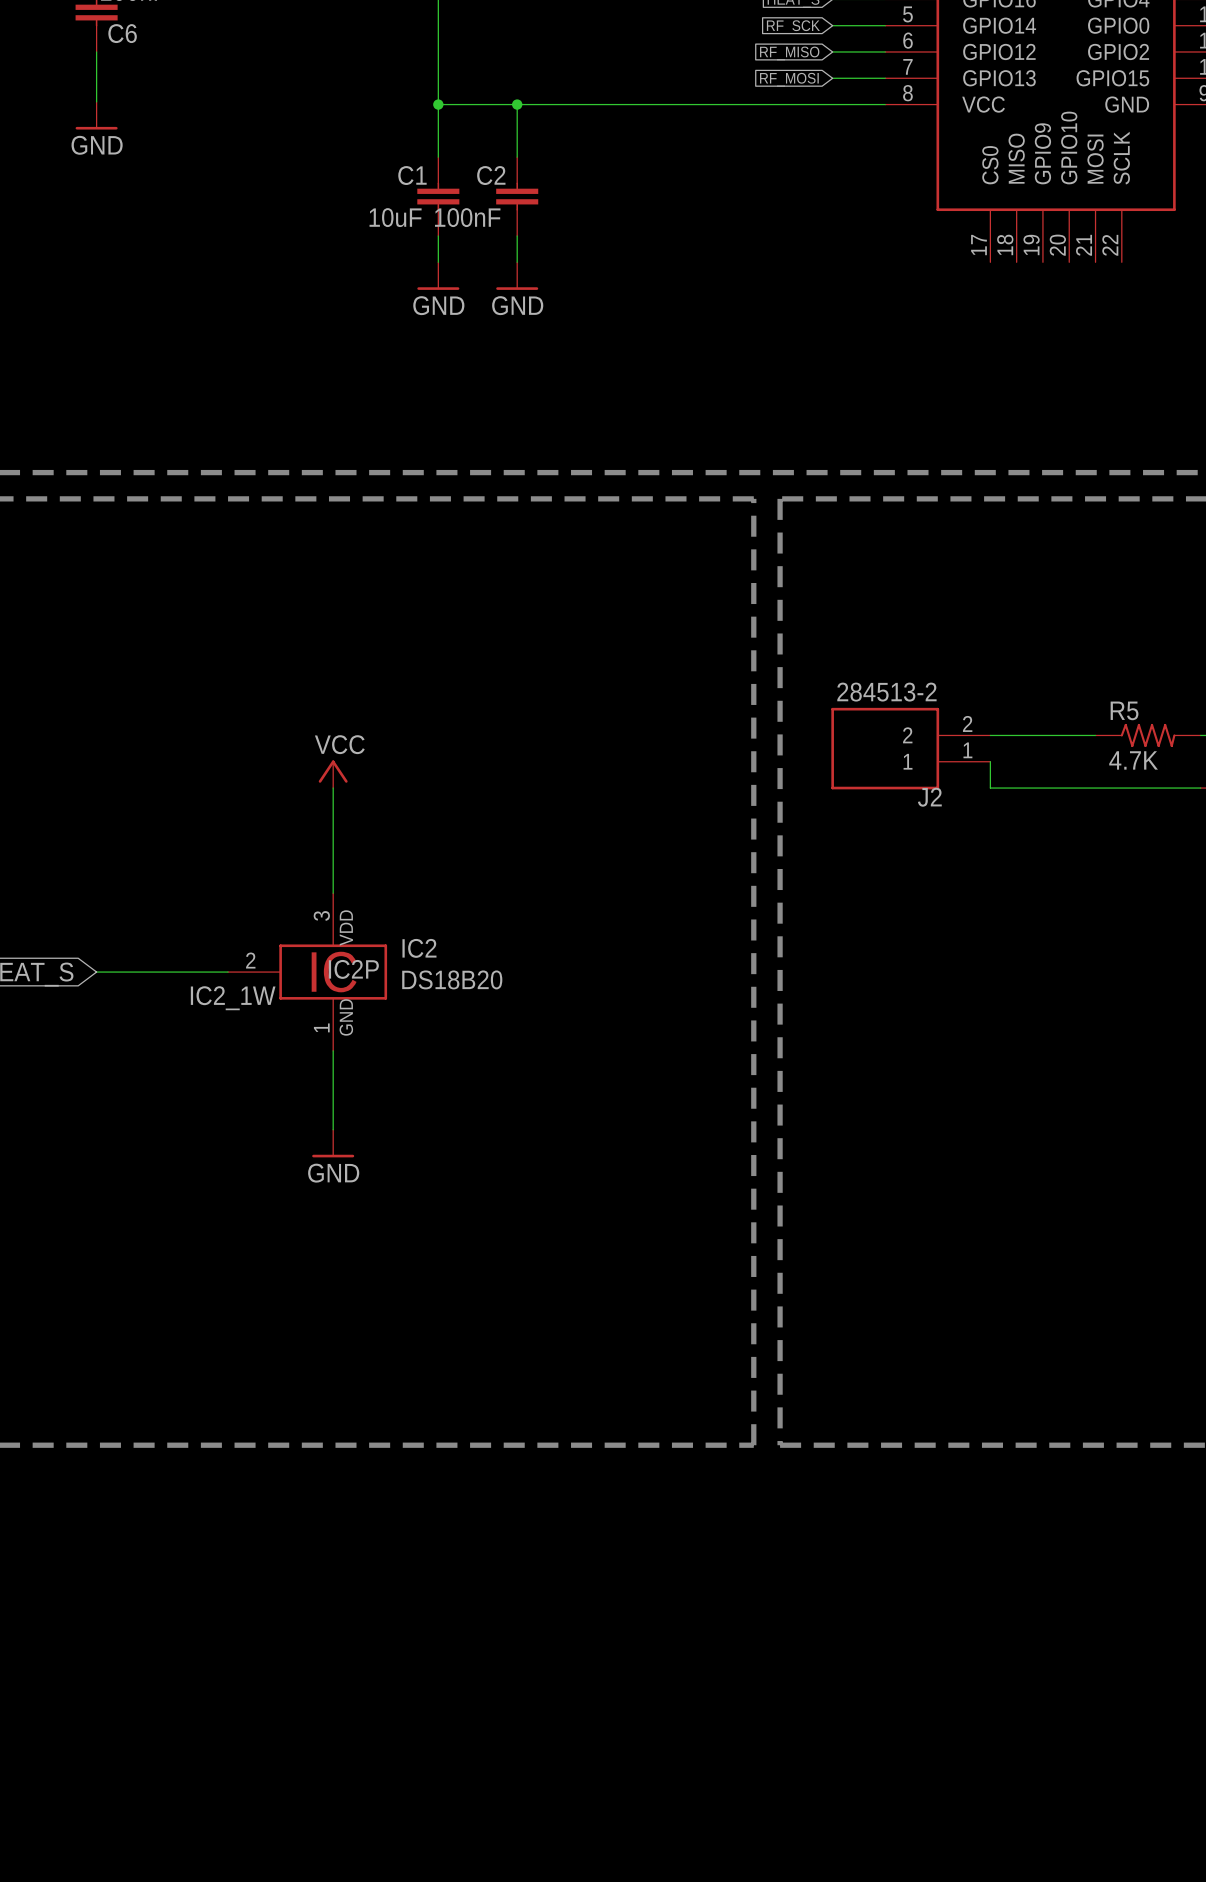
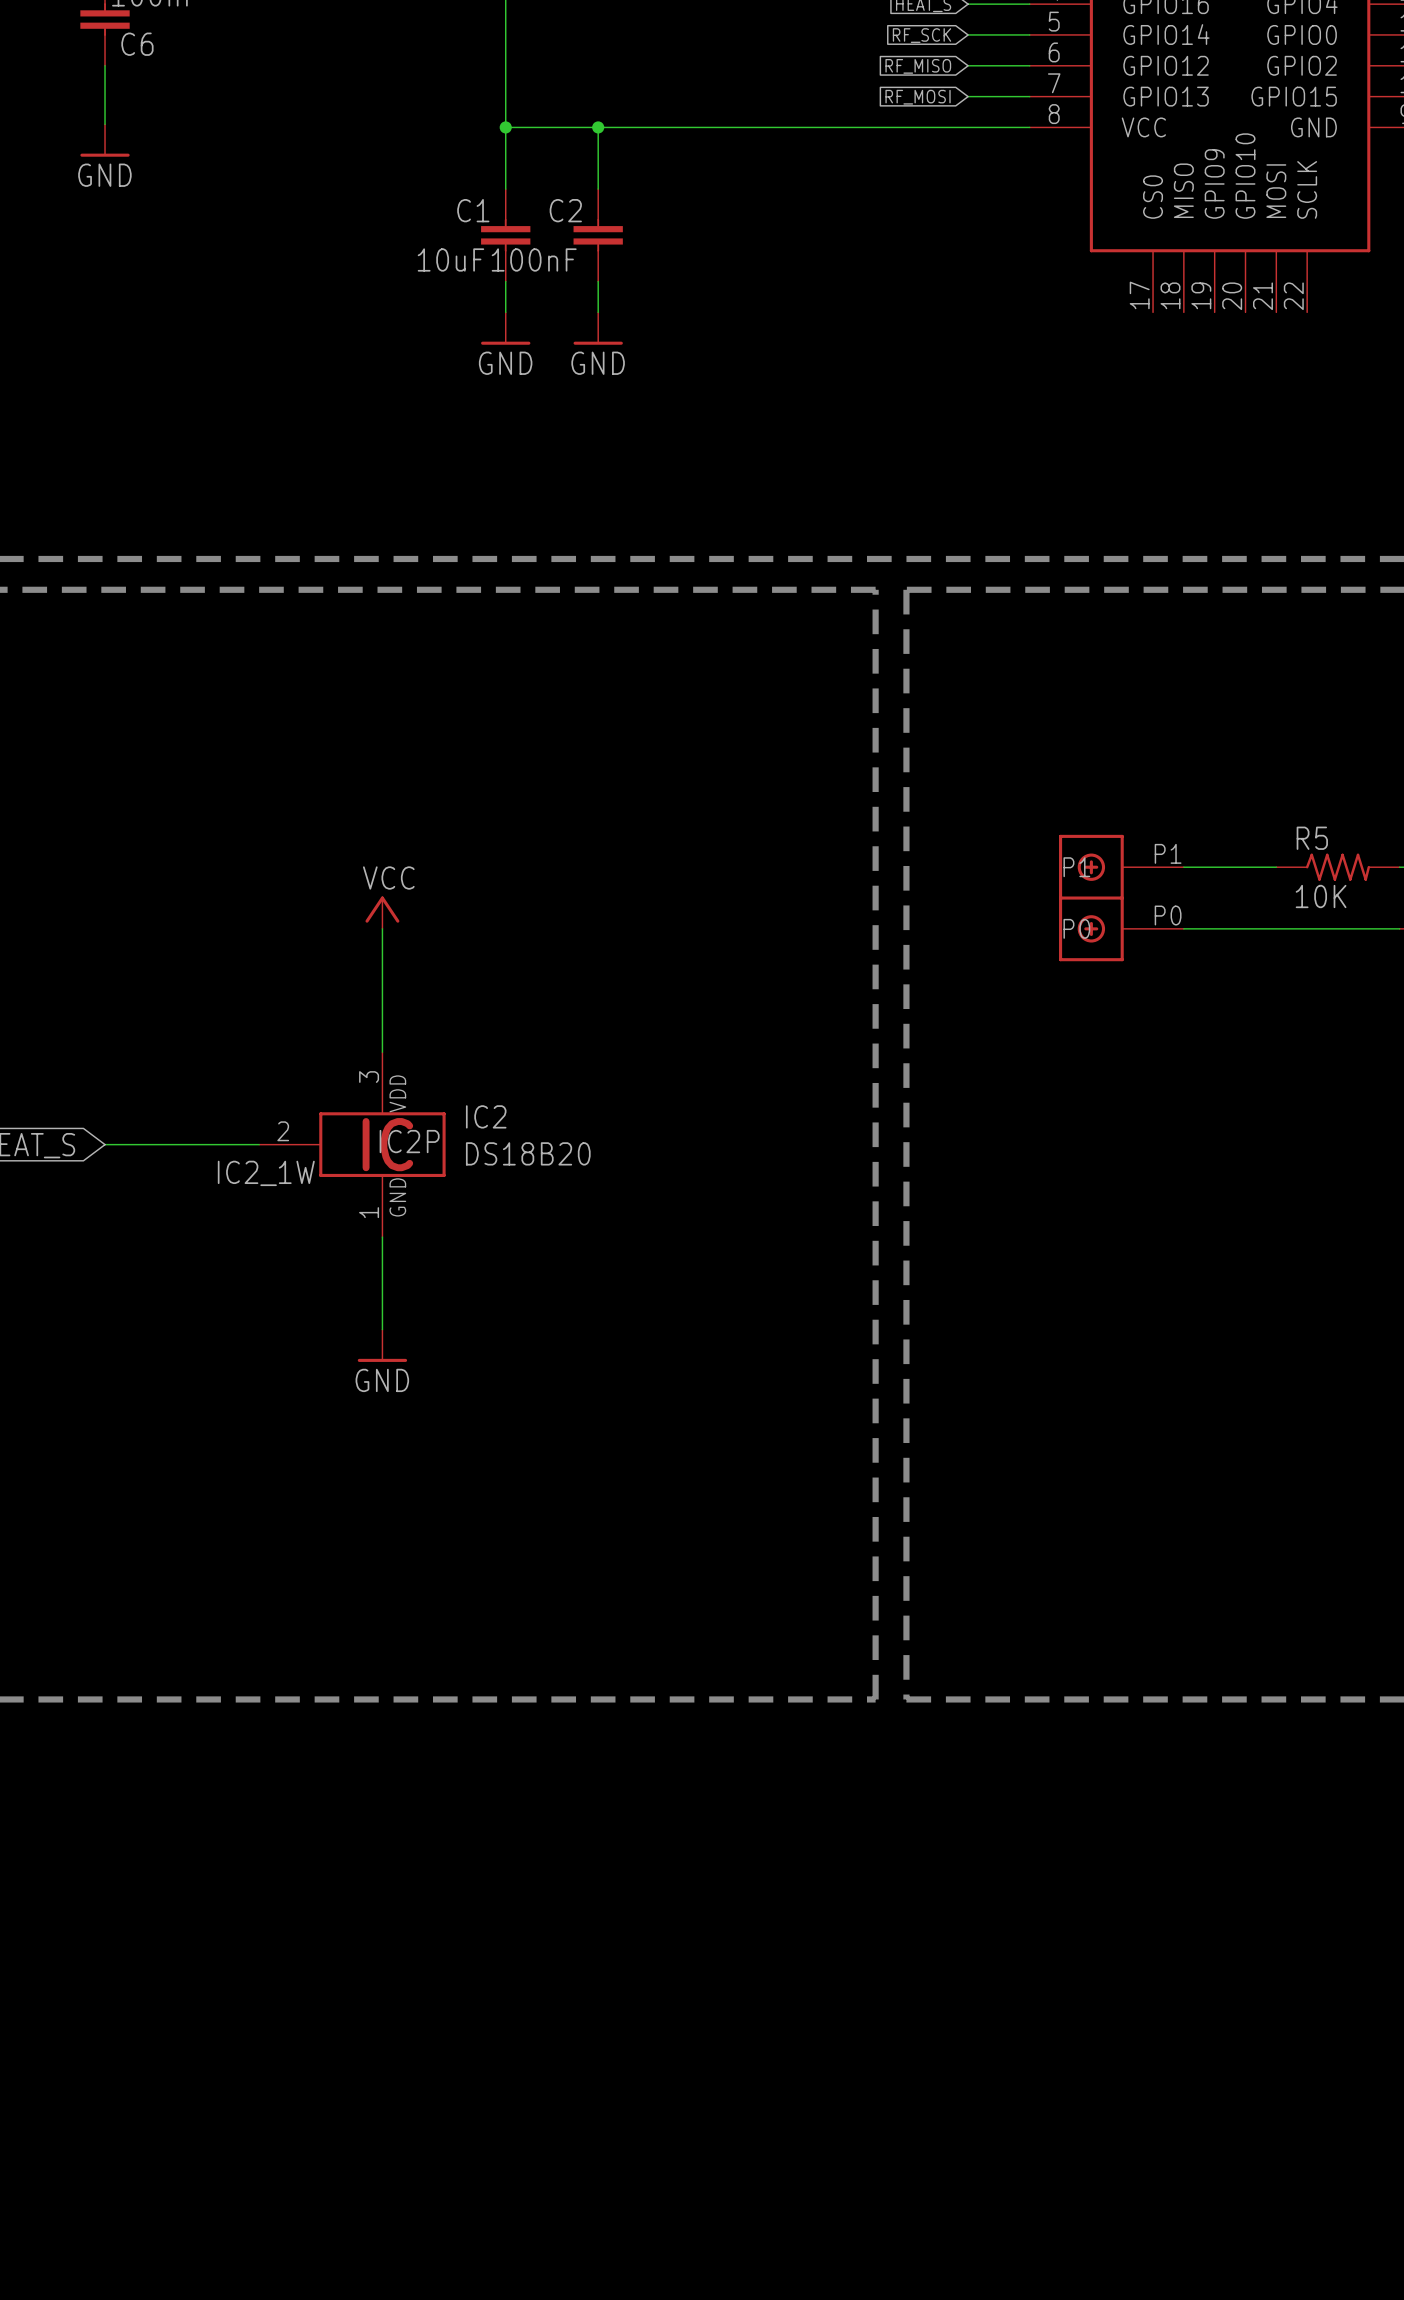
J2: 284513-2 (910, 748) -> none
R5 value: 4.7K (1133, 760) -> 10K (1321, 896)
part: none -> (1121, 898)

